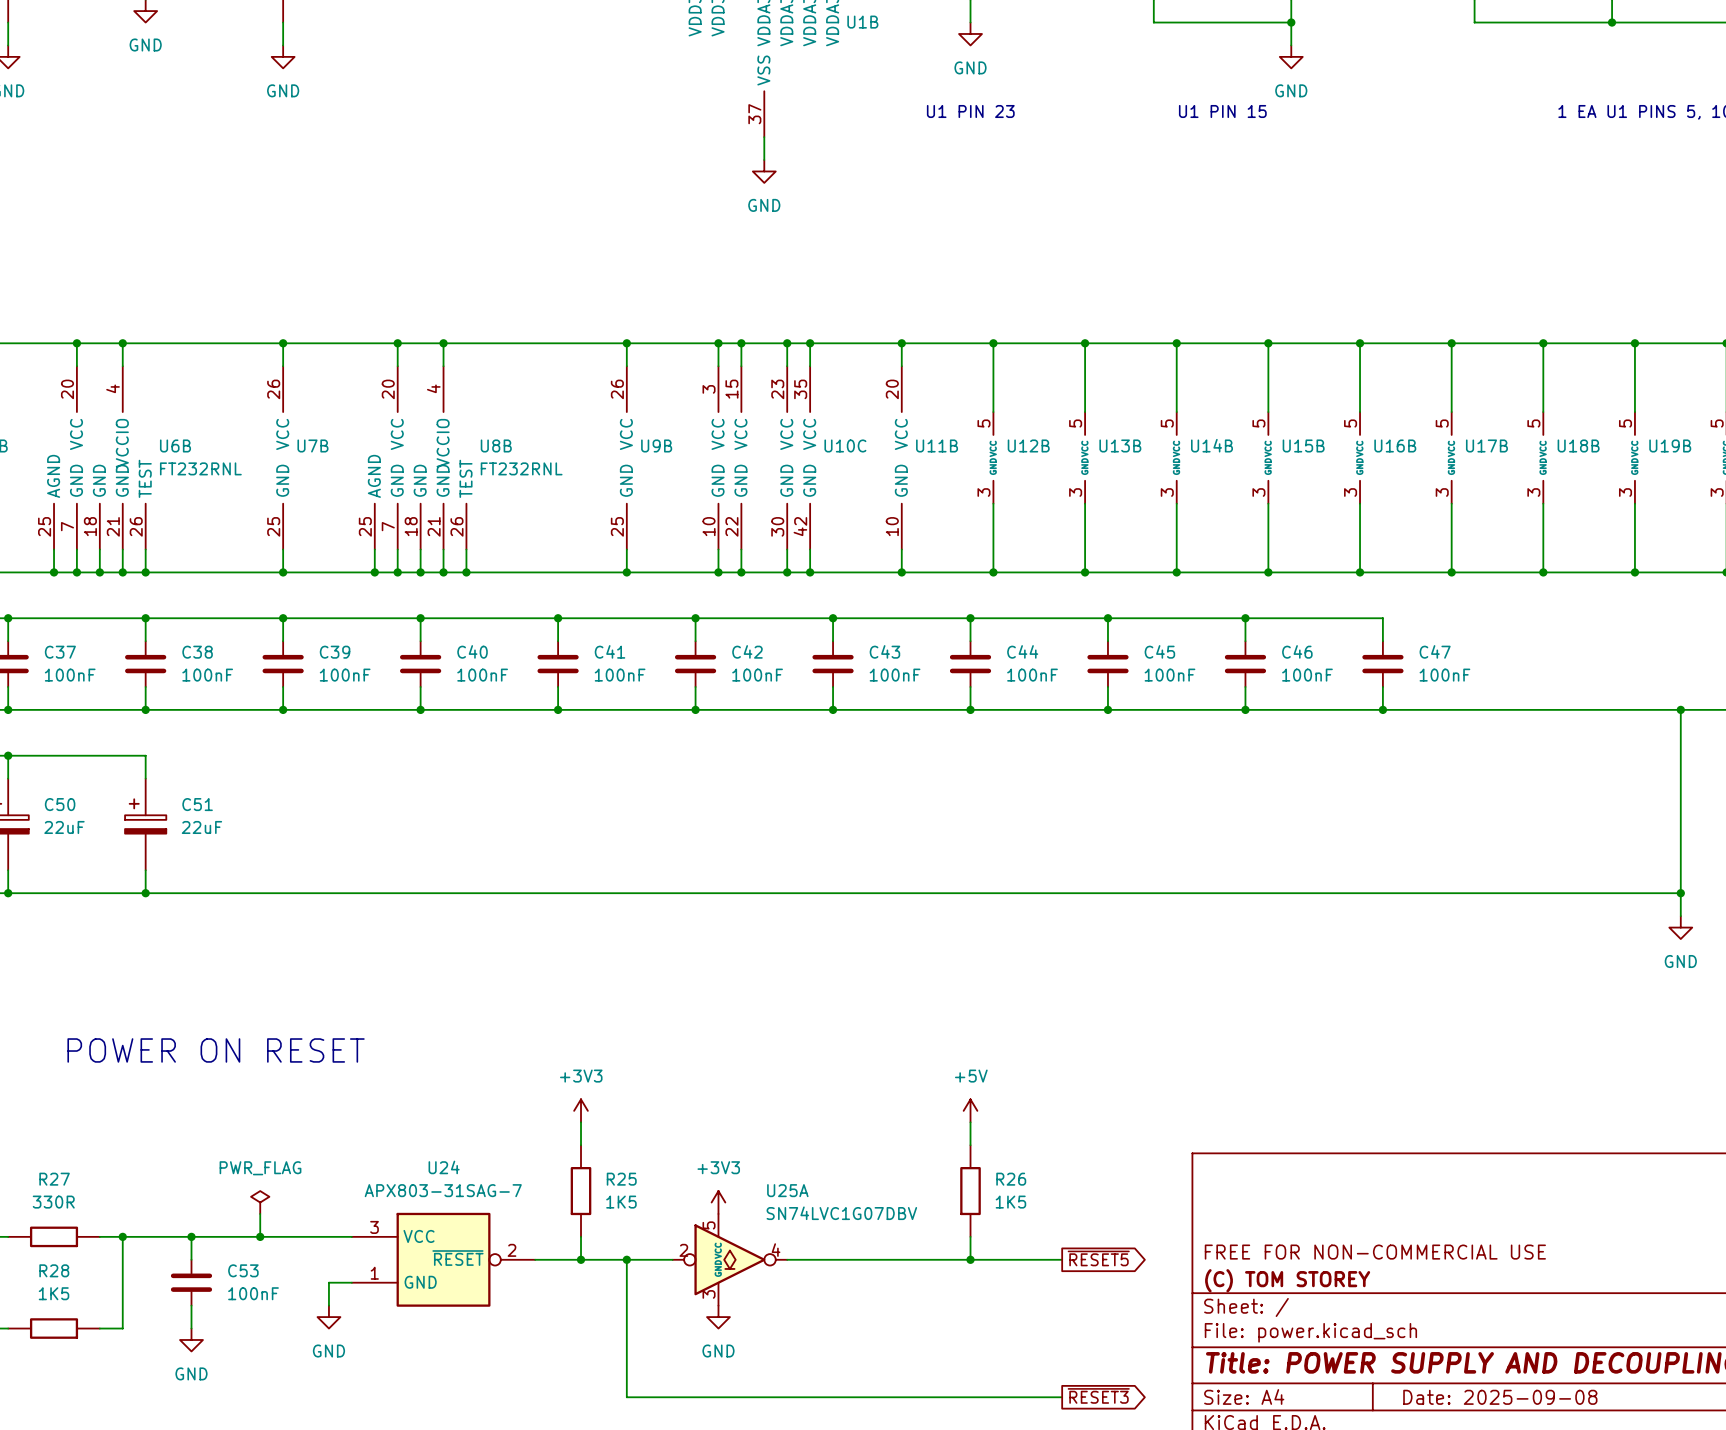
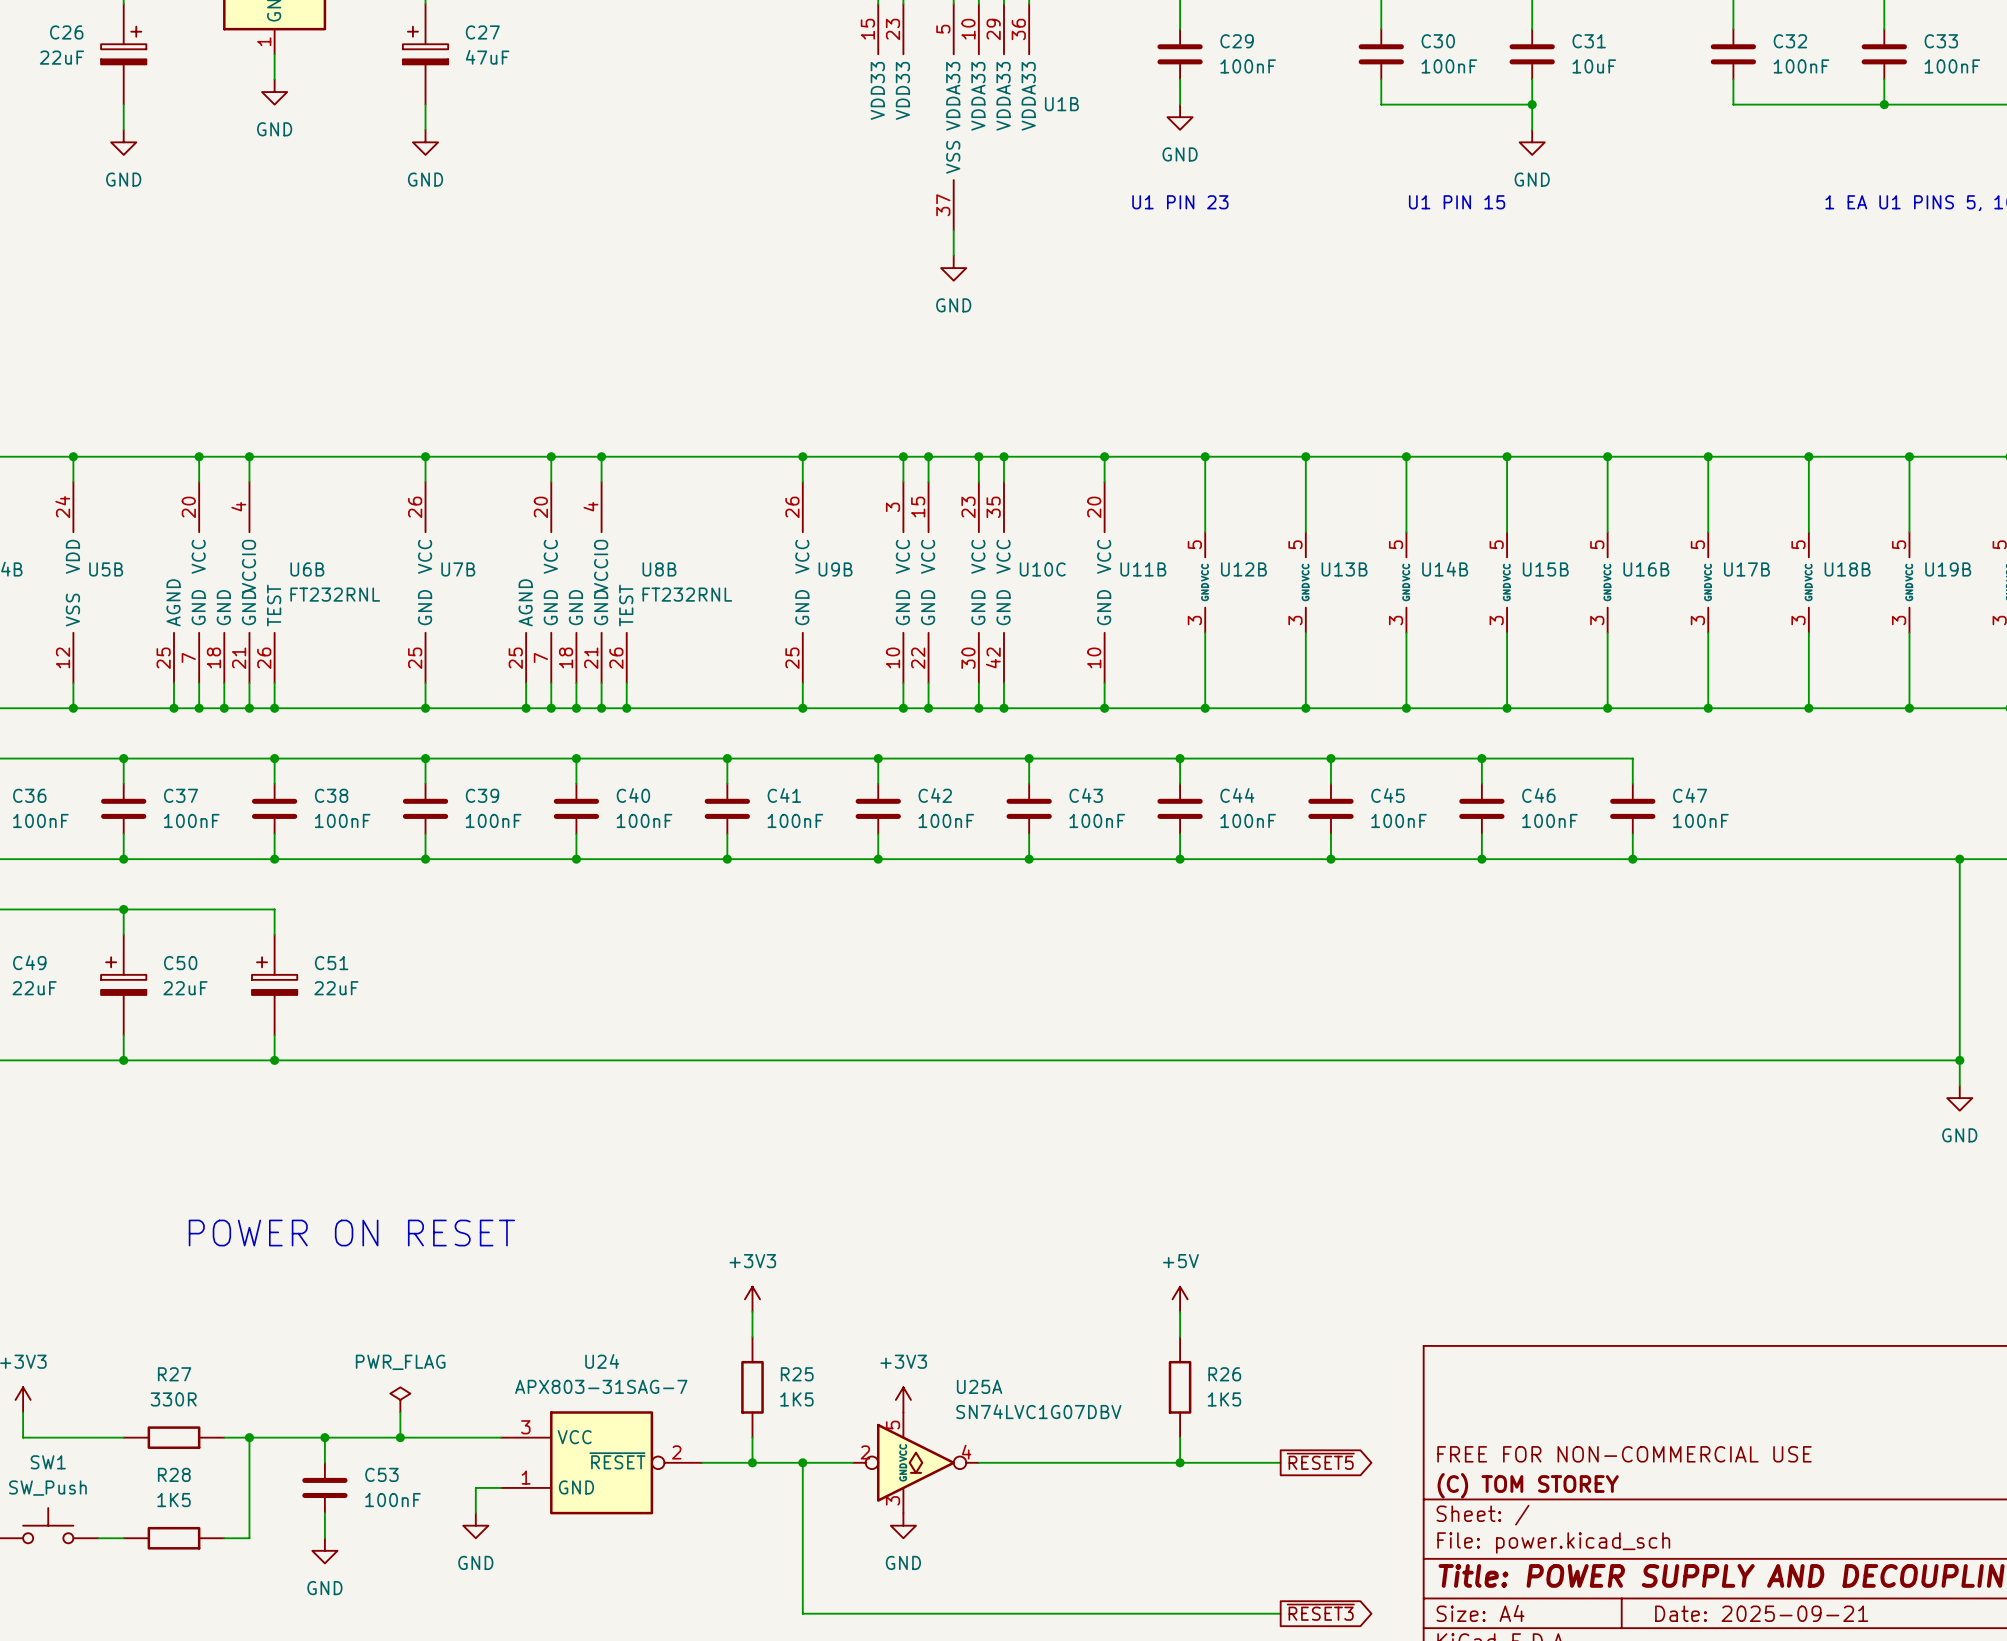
title block: Date: 2025-09-08 (1500, 1397) -> Date: 2025-09-21 (1761, 1613)

